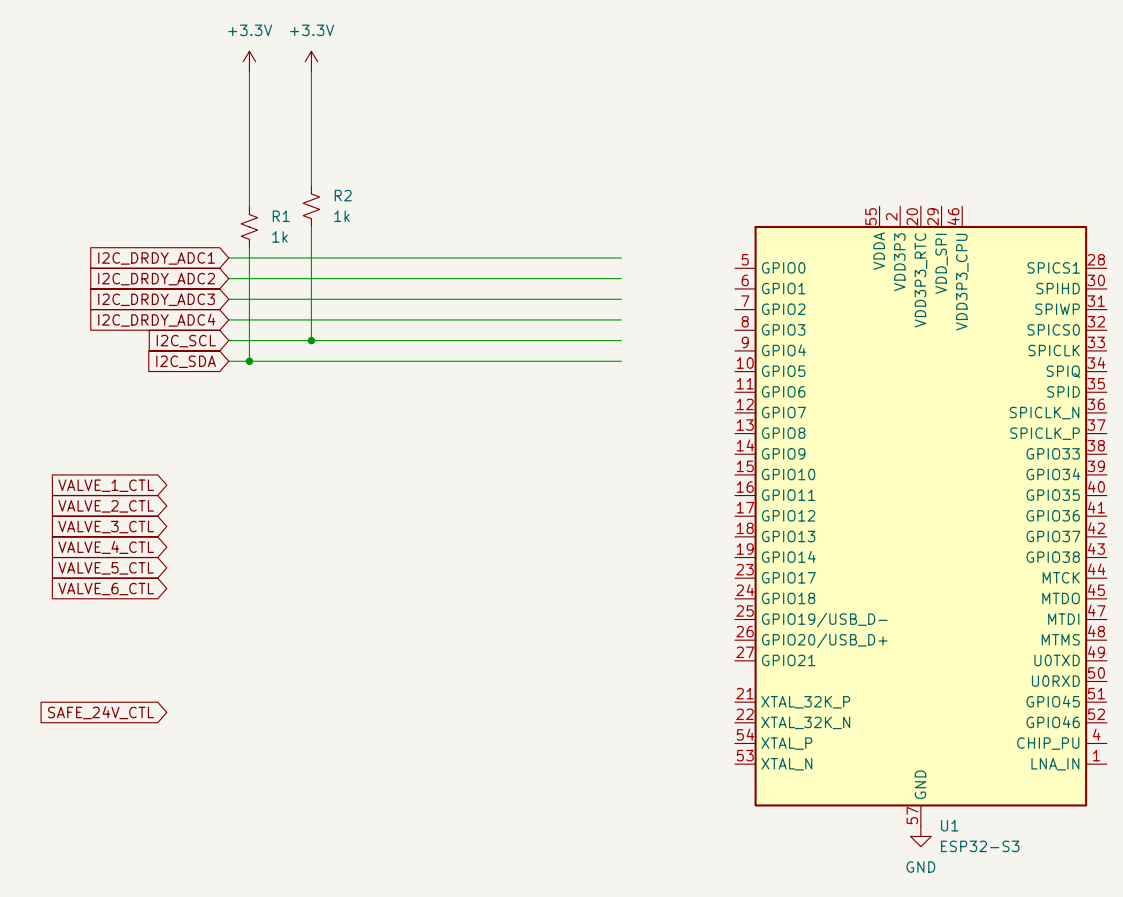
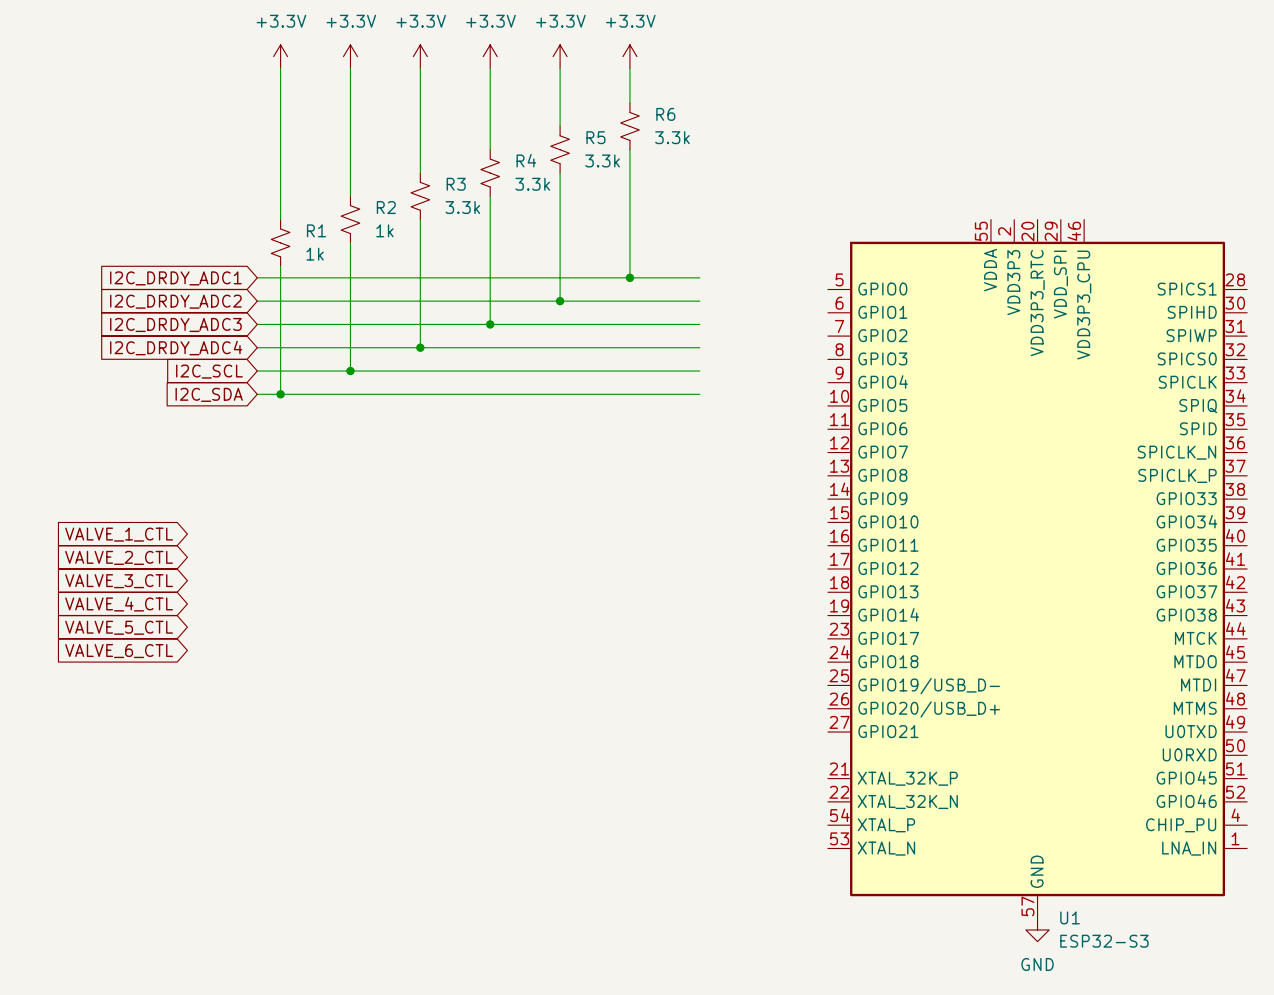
power symbol: none -> +3.3V (420, 56)
power symbol: none -> +3.3V (490, 56)
power symbol: none -> +3.3V (560, 56)
power symbol: none -> +3.3V (629, 56)
wire: none -> (420, 68) (420, 173)
wire: none -> (490, 68) (490, 149)
wire: none -> (560, 68) (560, 126)
wire: none -> (629, 68) (629, 103)
R6: none -> 3.3k (629, 126)
R5: none -> 3.3k (560, 149)
wire: none -> (629, 149) (629, 277)
R4: none -> 3.3k (490, 173)
wire: none -> (560, 173) (560, 301)
R3: none -> 3.3k (420, 196)
wire: none -> (490, 196) (490, 324)
wire: none -> (420, 219) (420, 347)
junction: none -> (629, 277)
junction: none -> (560, 301)
junction: none -> (490, 324)
junction: none -> (420, 347)
global label: SAFE_24V_CTL (100, 712) -> none

